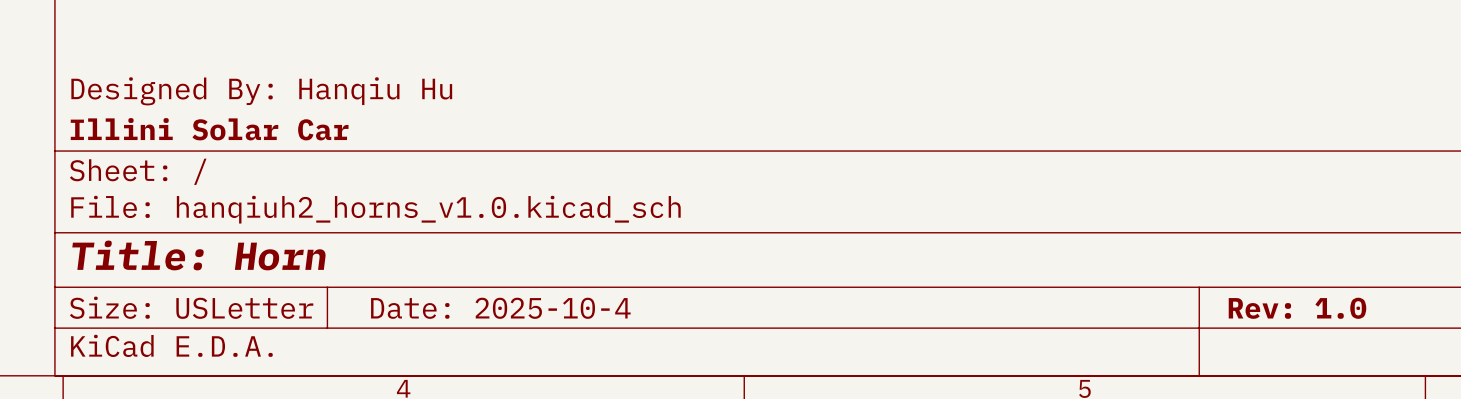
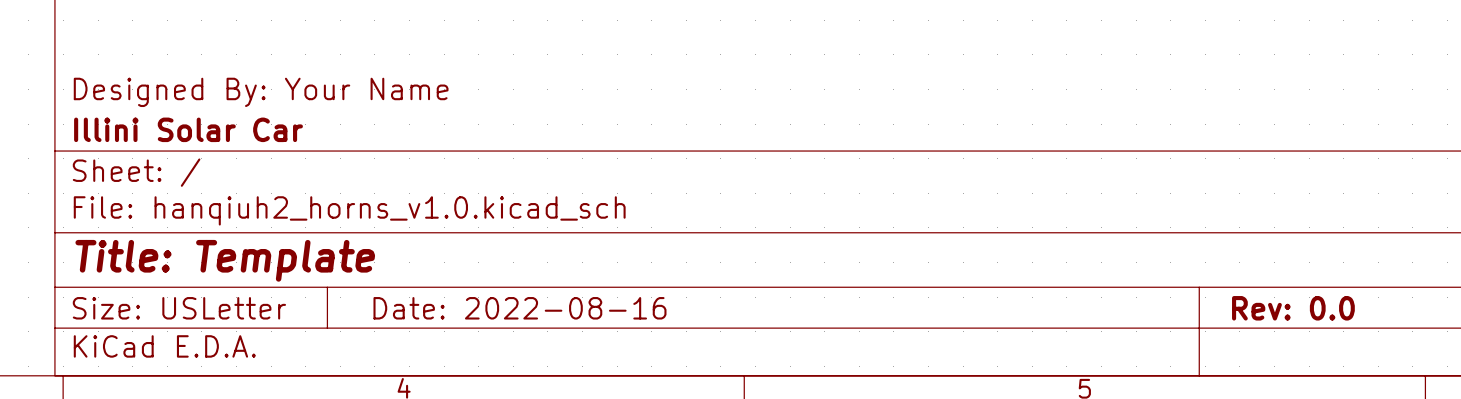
title block: Designed By: Hanqiu Hu (261, 91) -> Designed By: Your Name (261, 92)
title block: Title: Horn (199, 255) -> Title: Template (225, 260)
title block: Date: 2025-10-4 (500, 308) -> Date: 2022-08-16 (519, 308)
title block: Rev: 1.0 (1297, 308) -> Rev: 0.0 (1293, 308)

